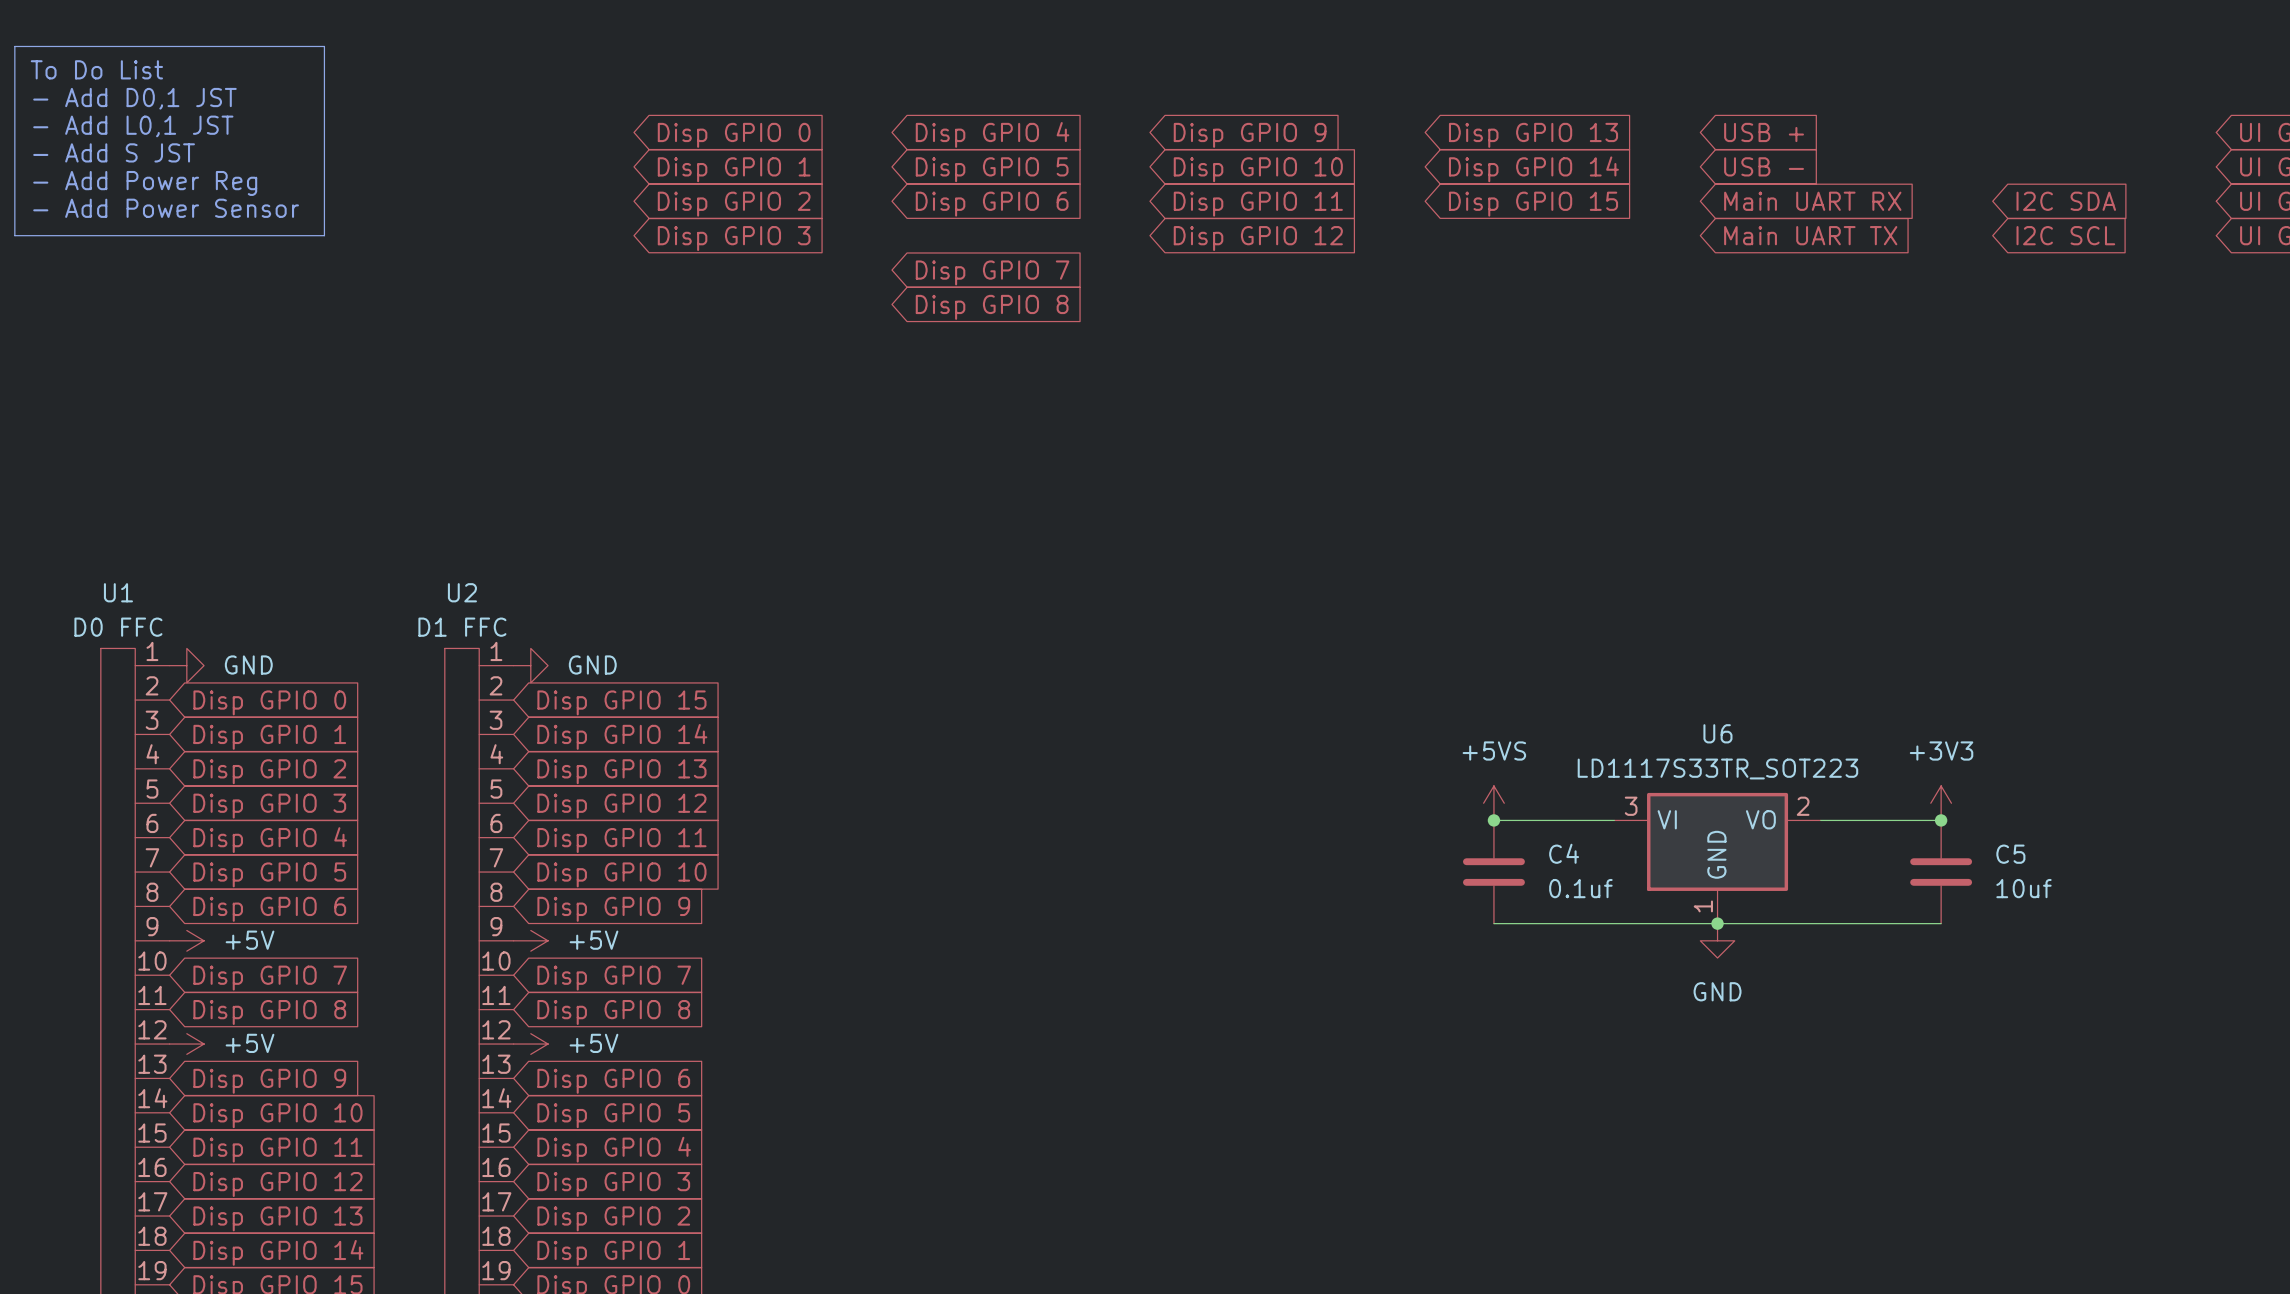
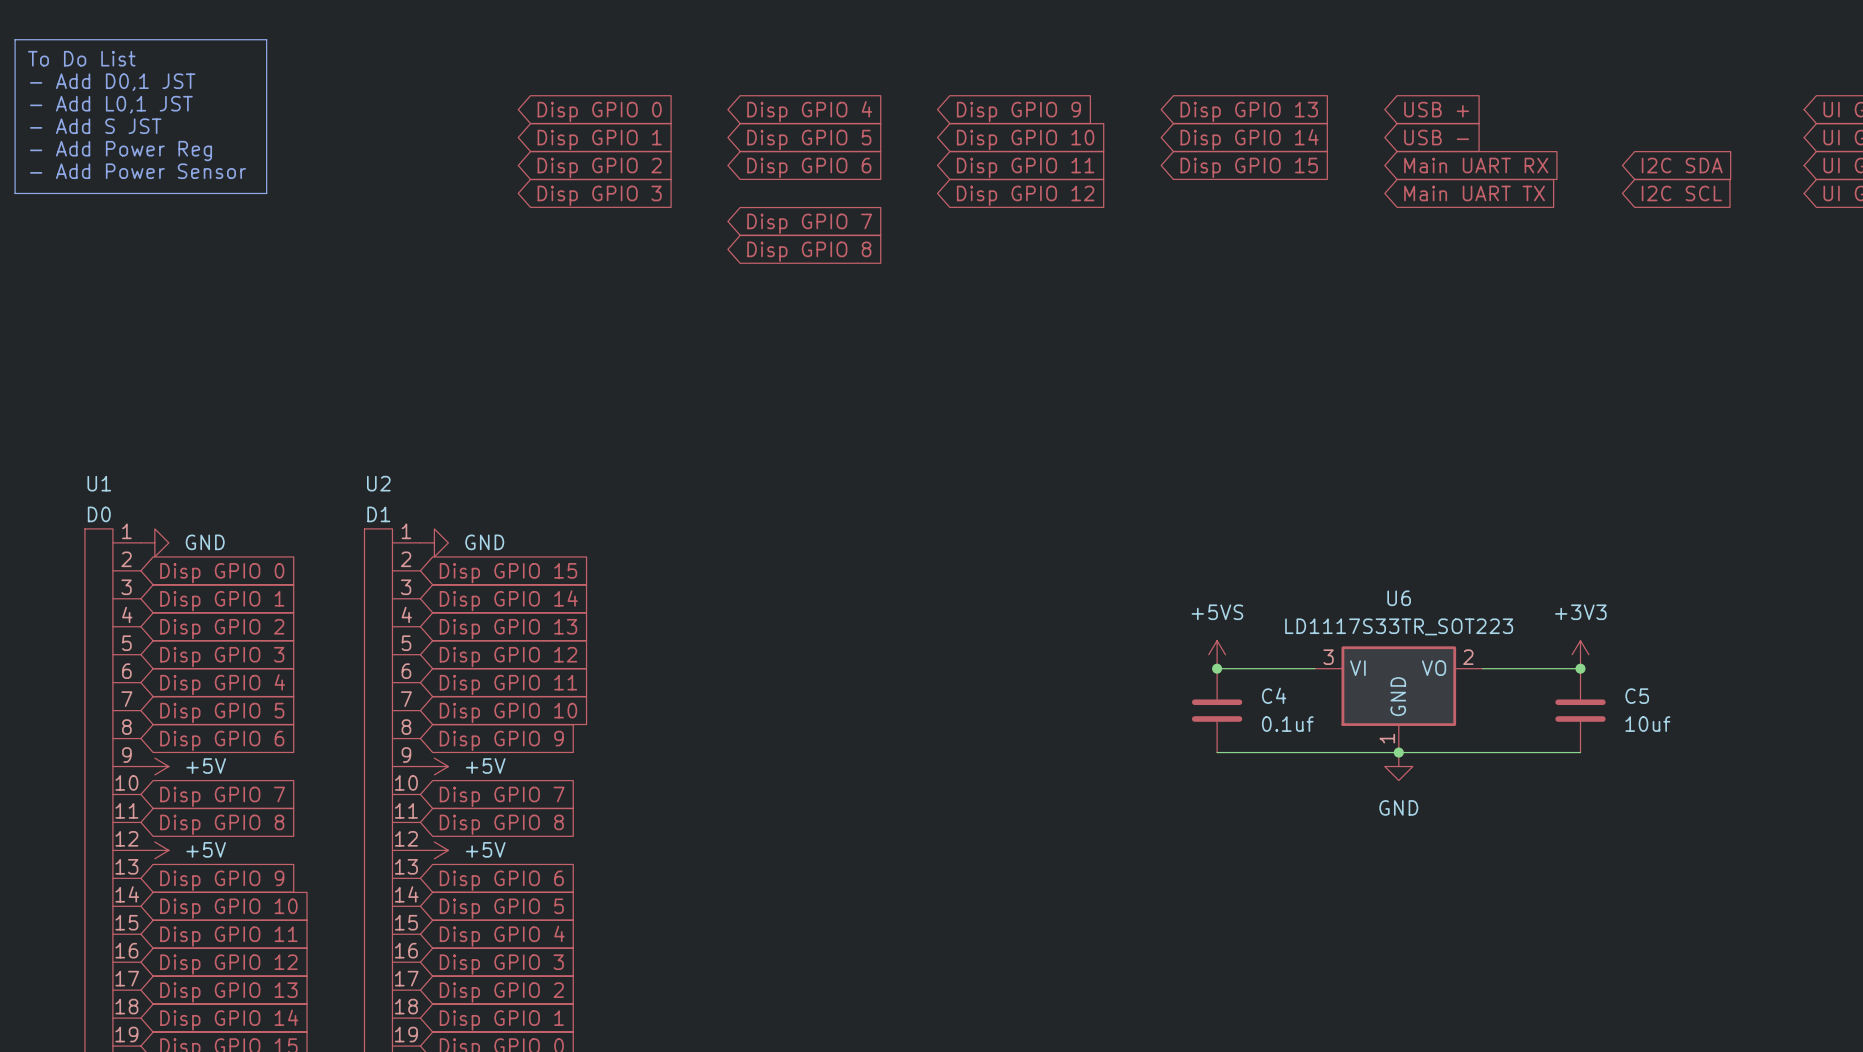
U1 value: D0 FFC (118, 627) -> D0 (99, 514)
U2 value: D1 FFC (462, 627) -> D1 (378, 514)

